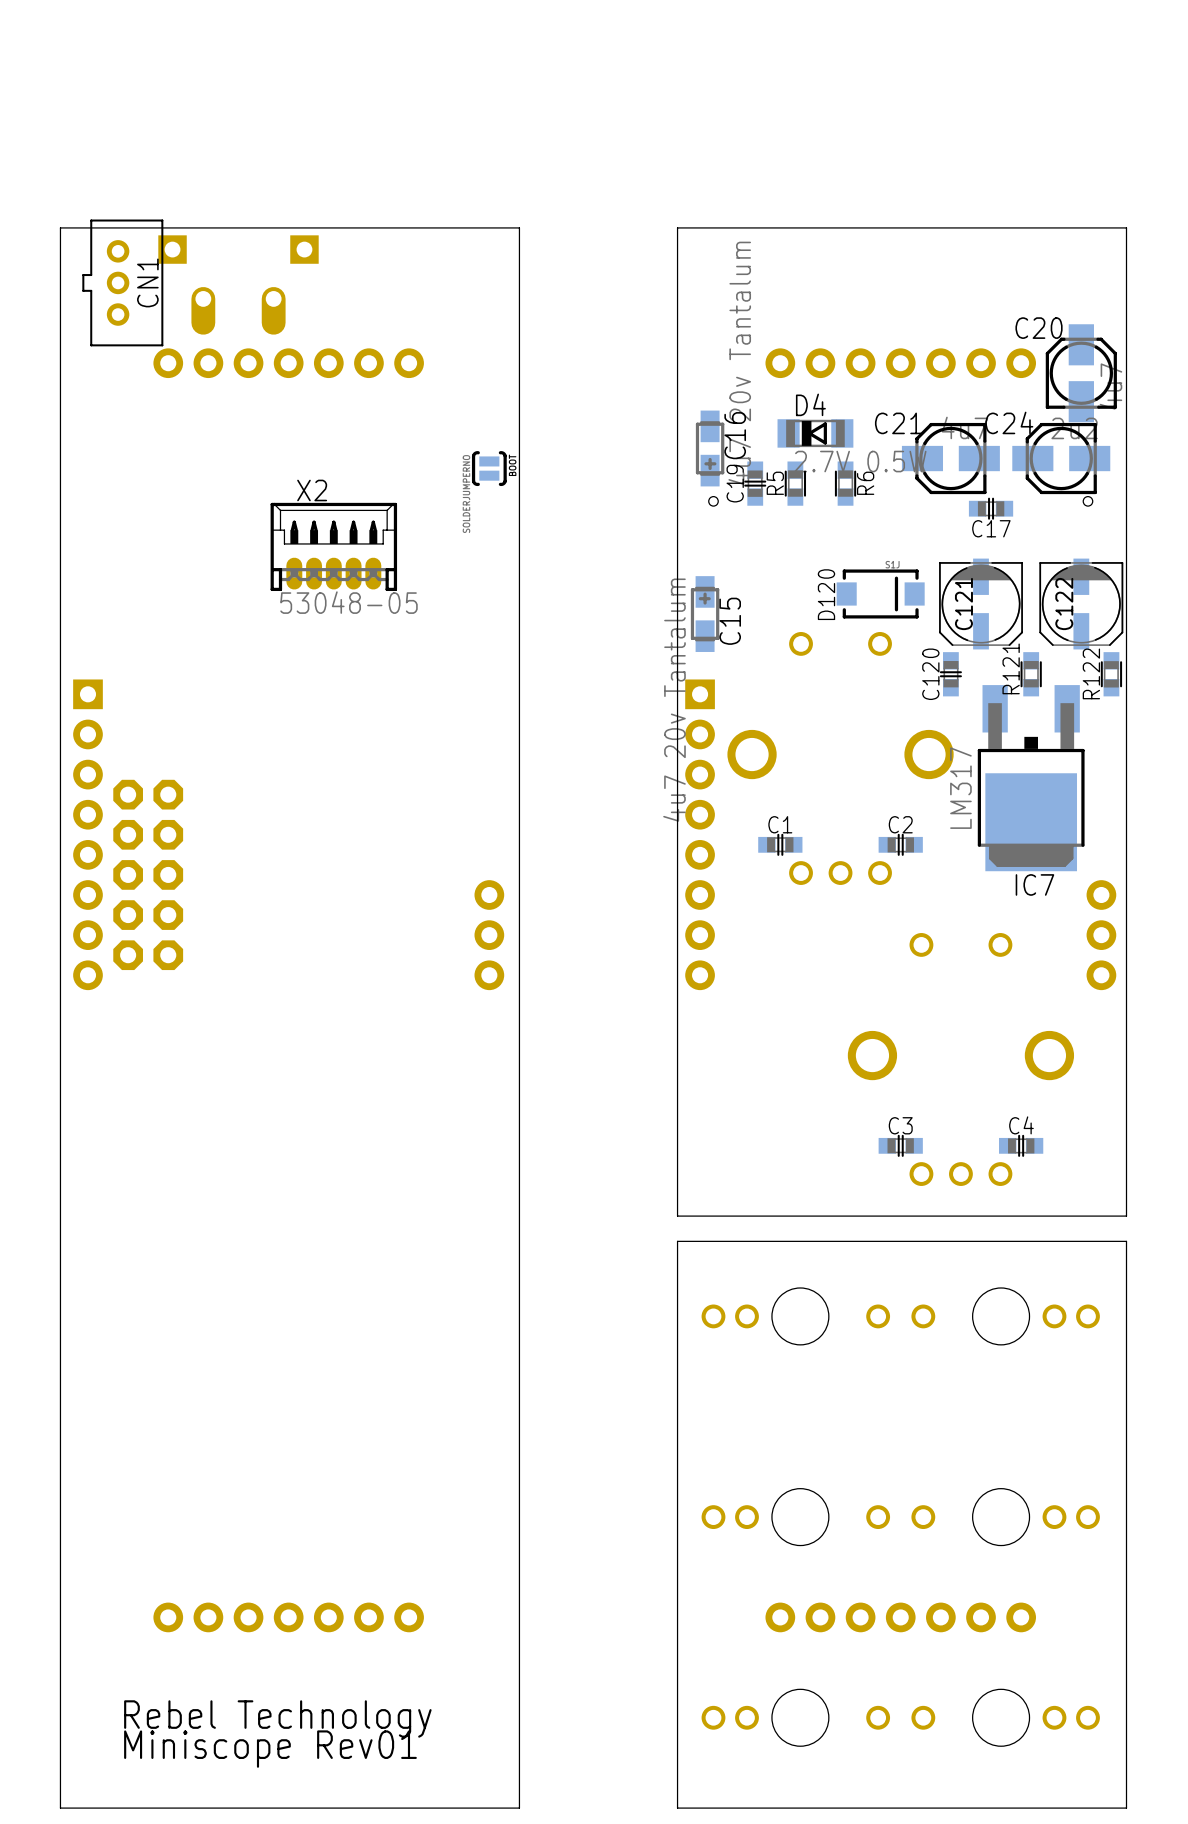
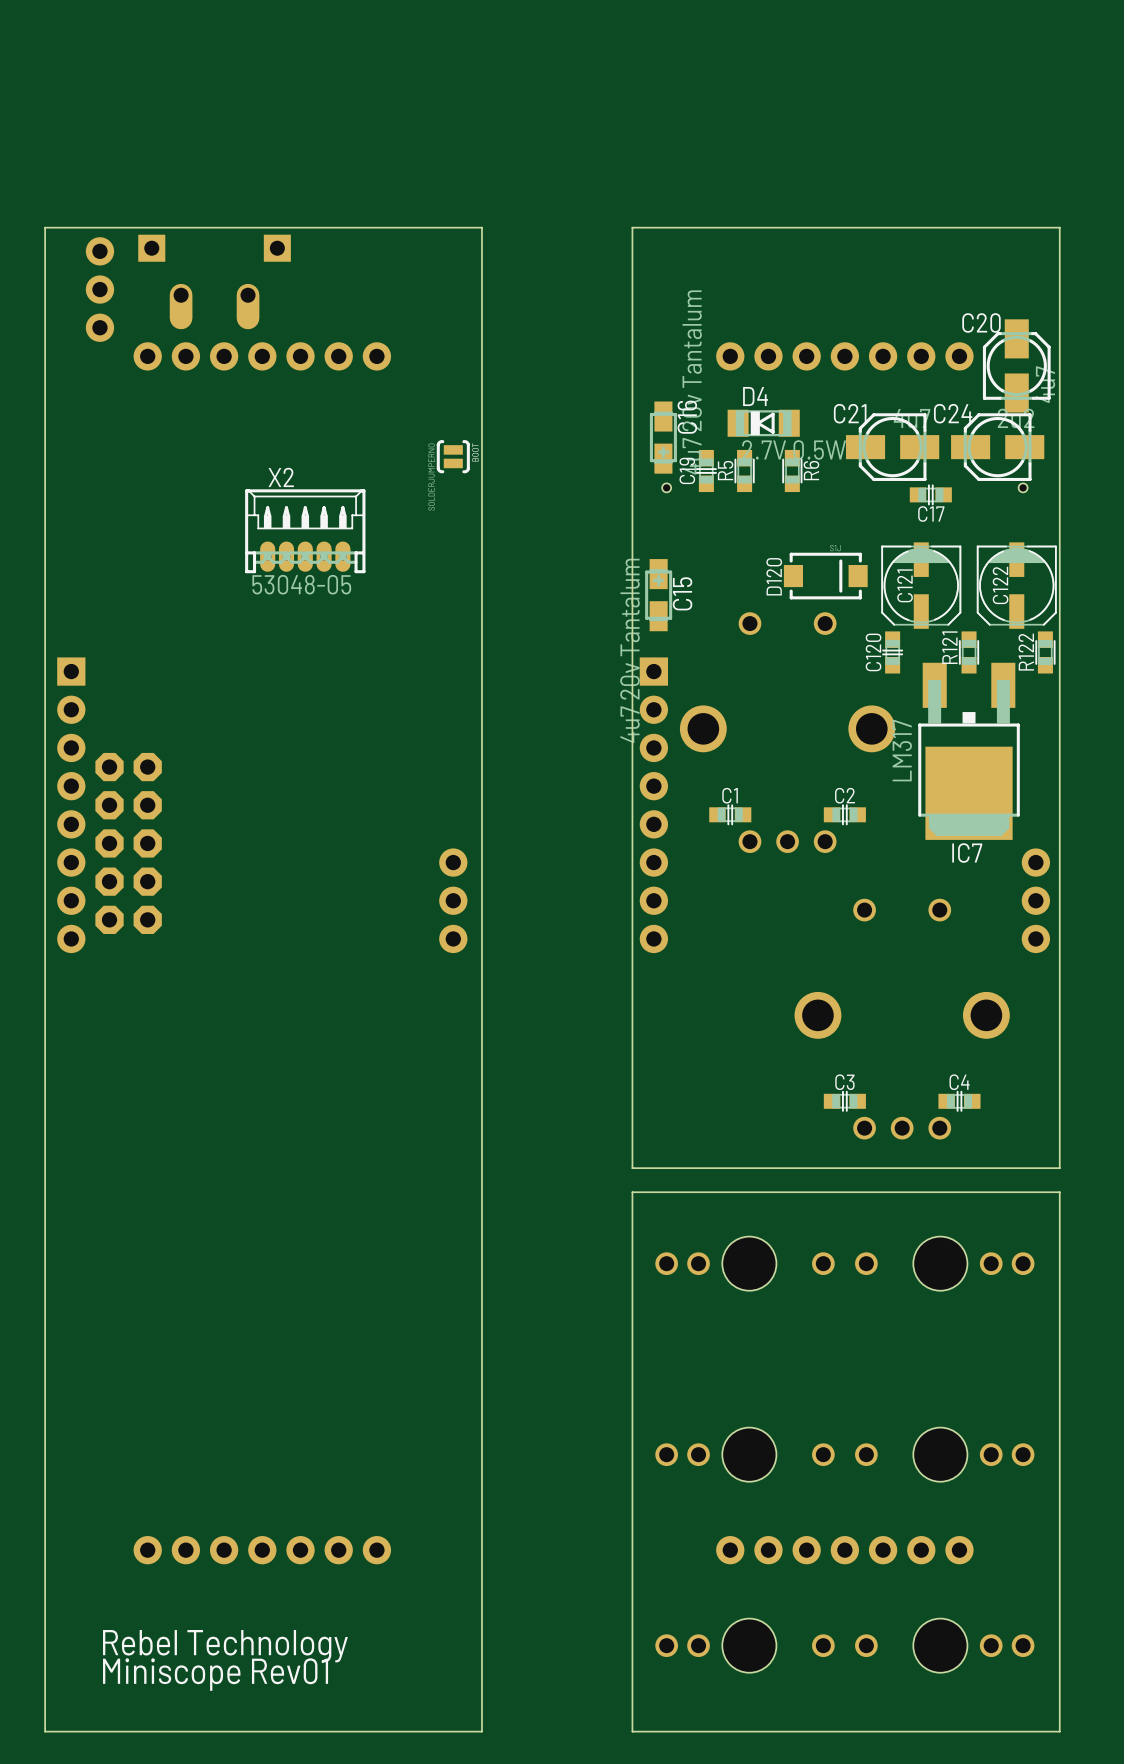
CN1: (122, 282) -> none
part: none -> (99, 289)

